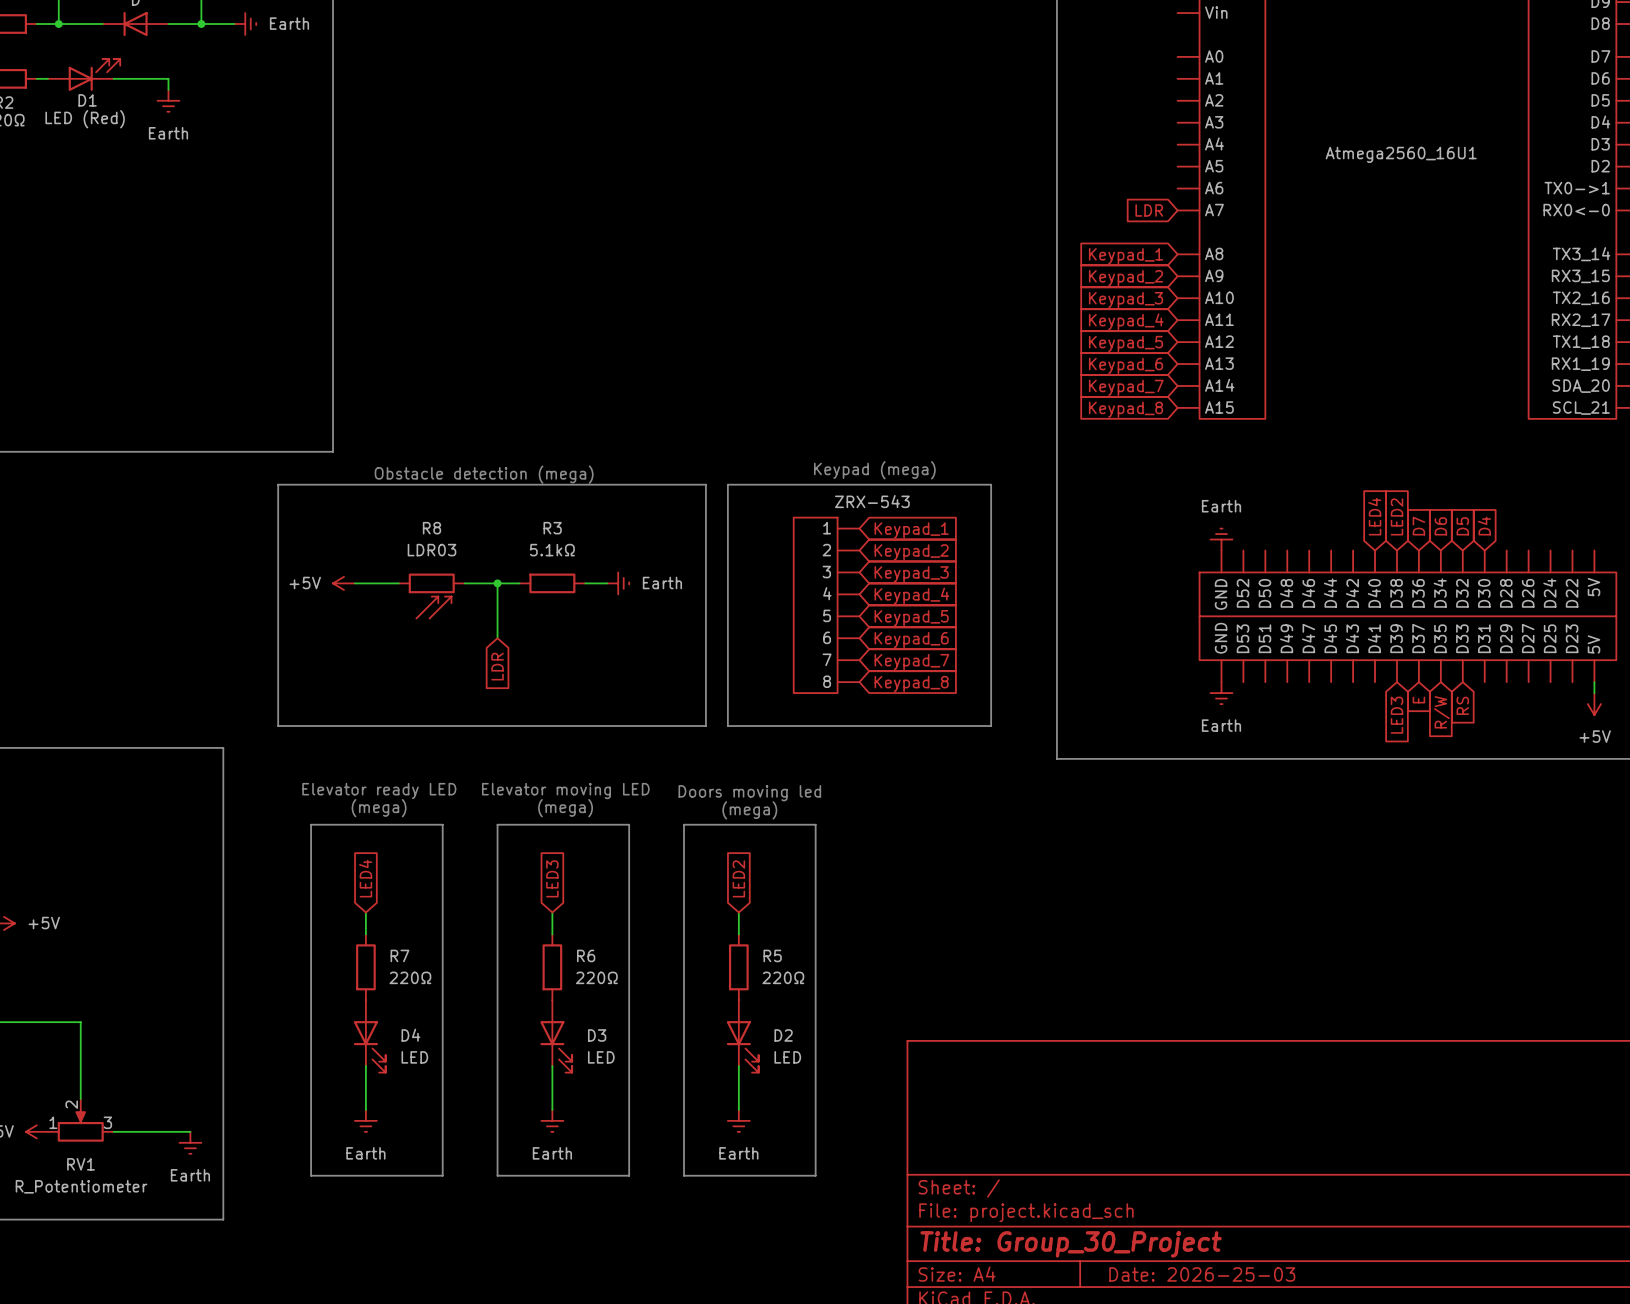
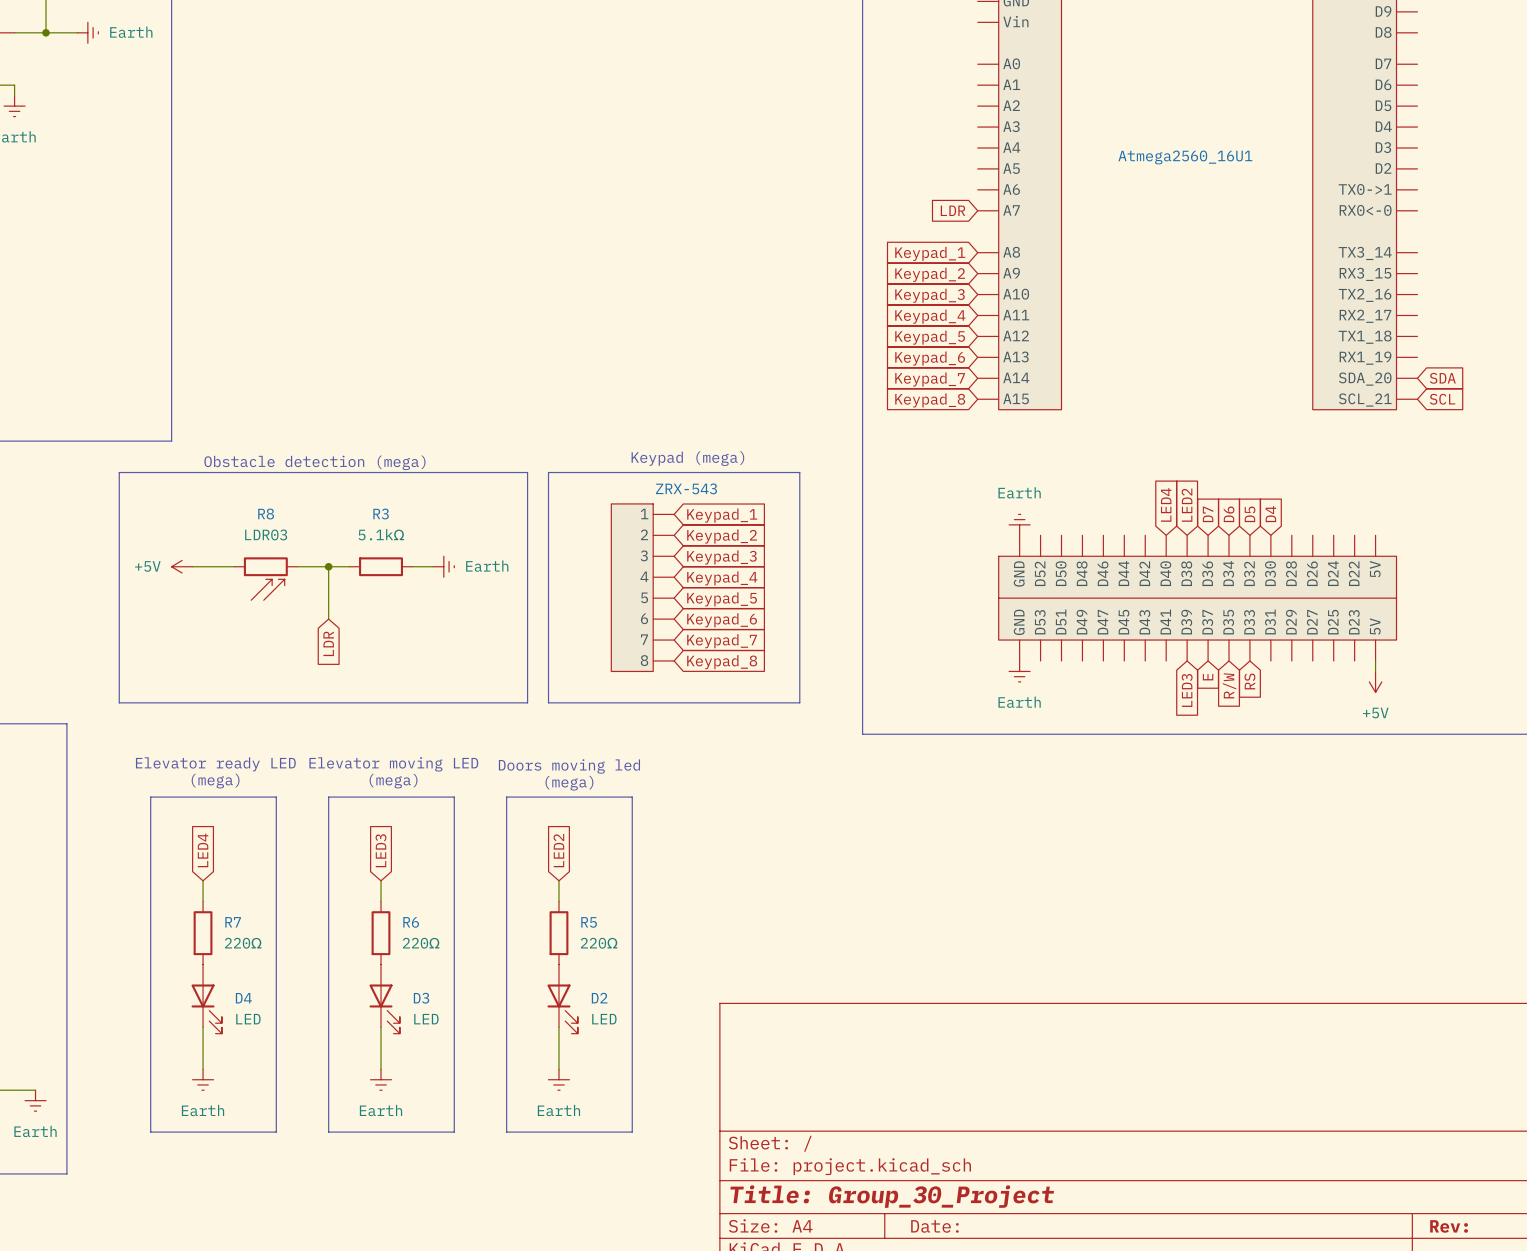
title block: Date: 2026-25-03 (1202, 1274) -> Date: (934, 1226)

